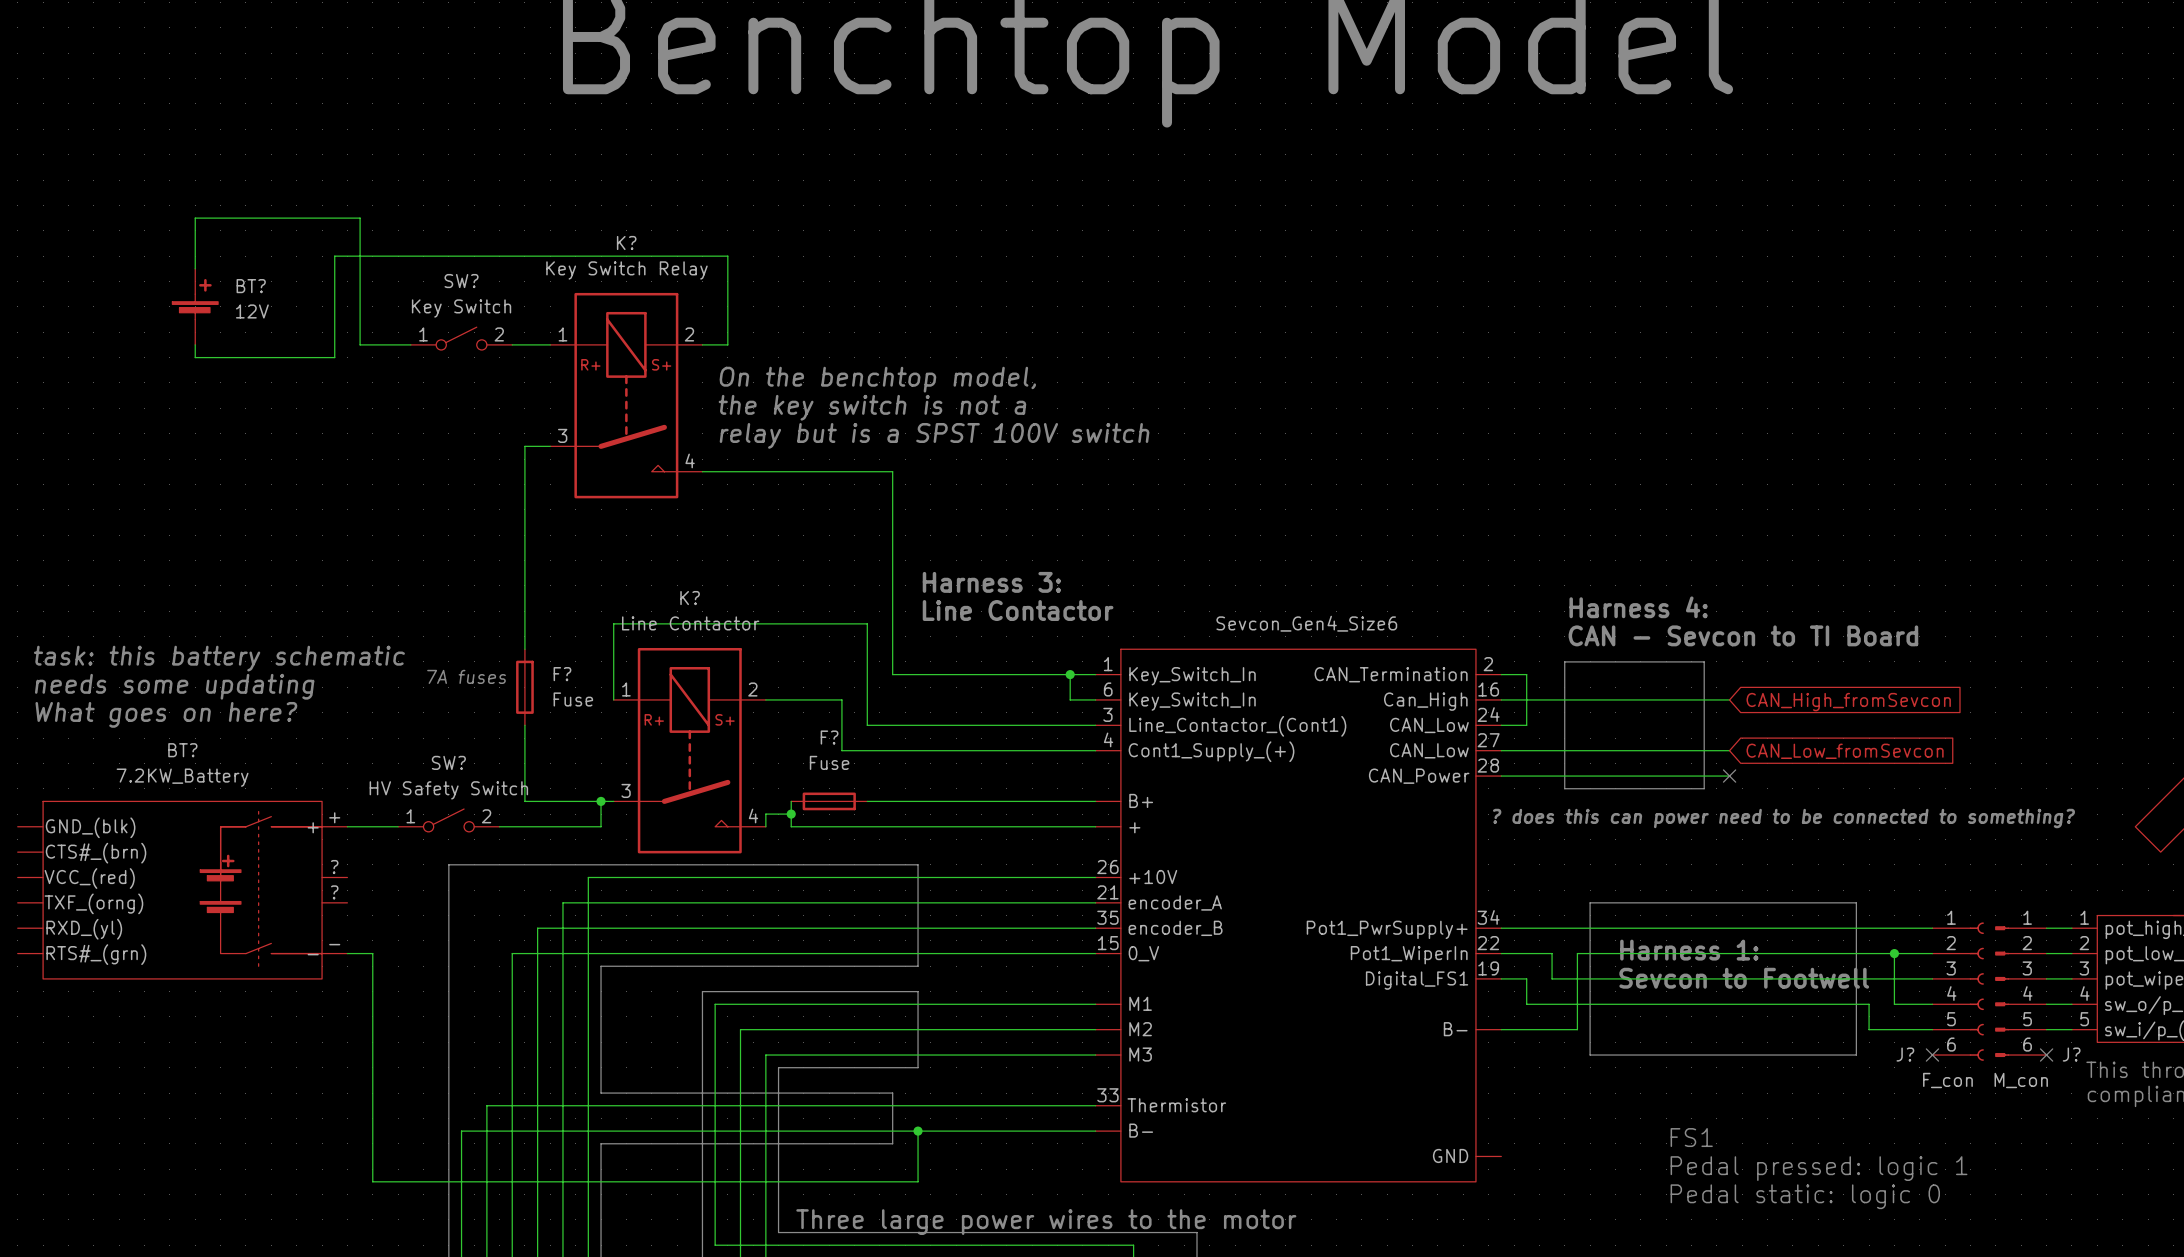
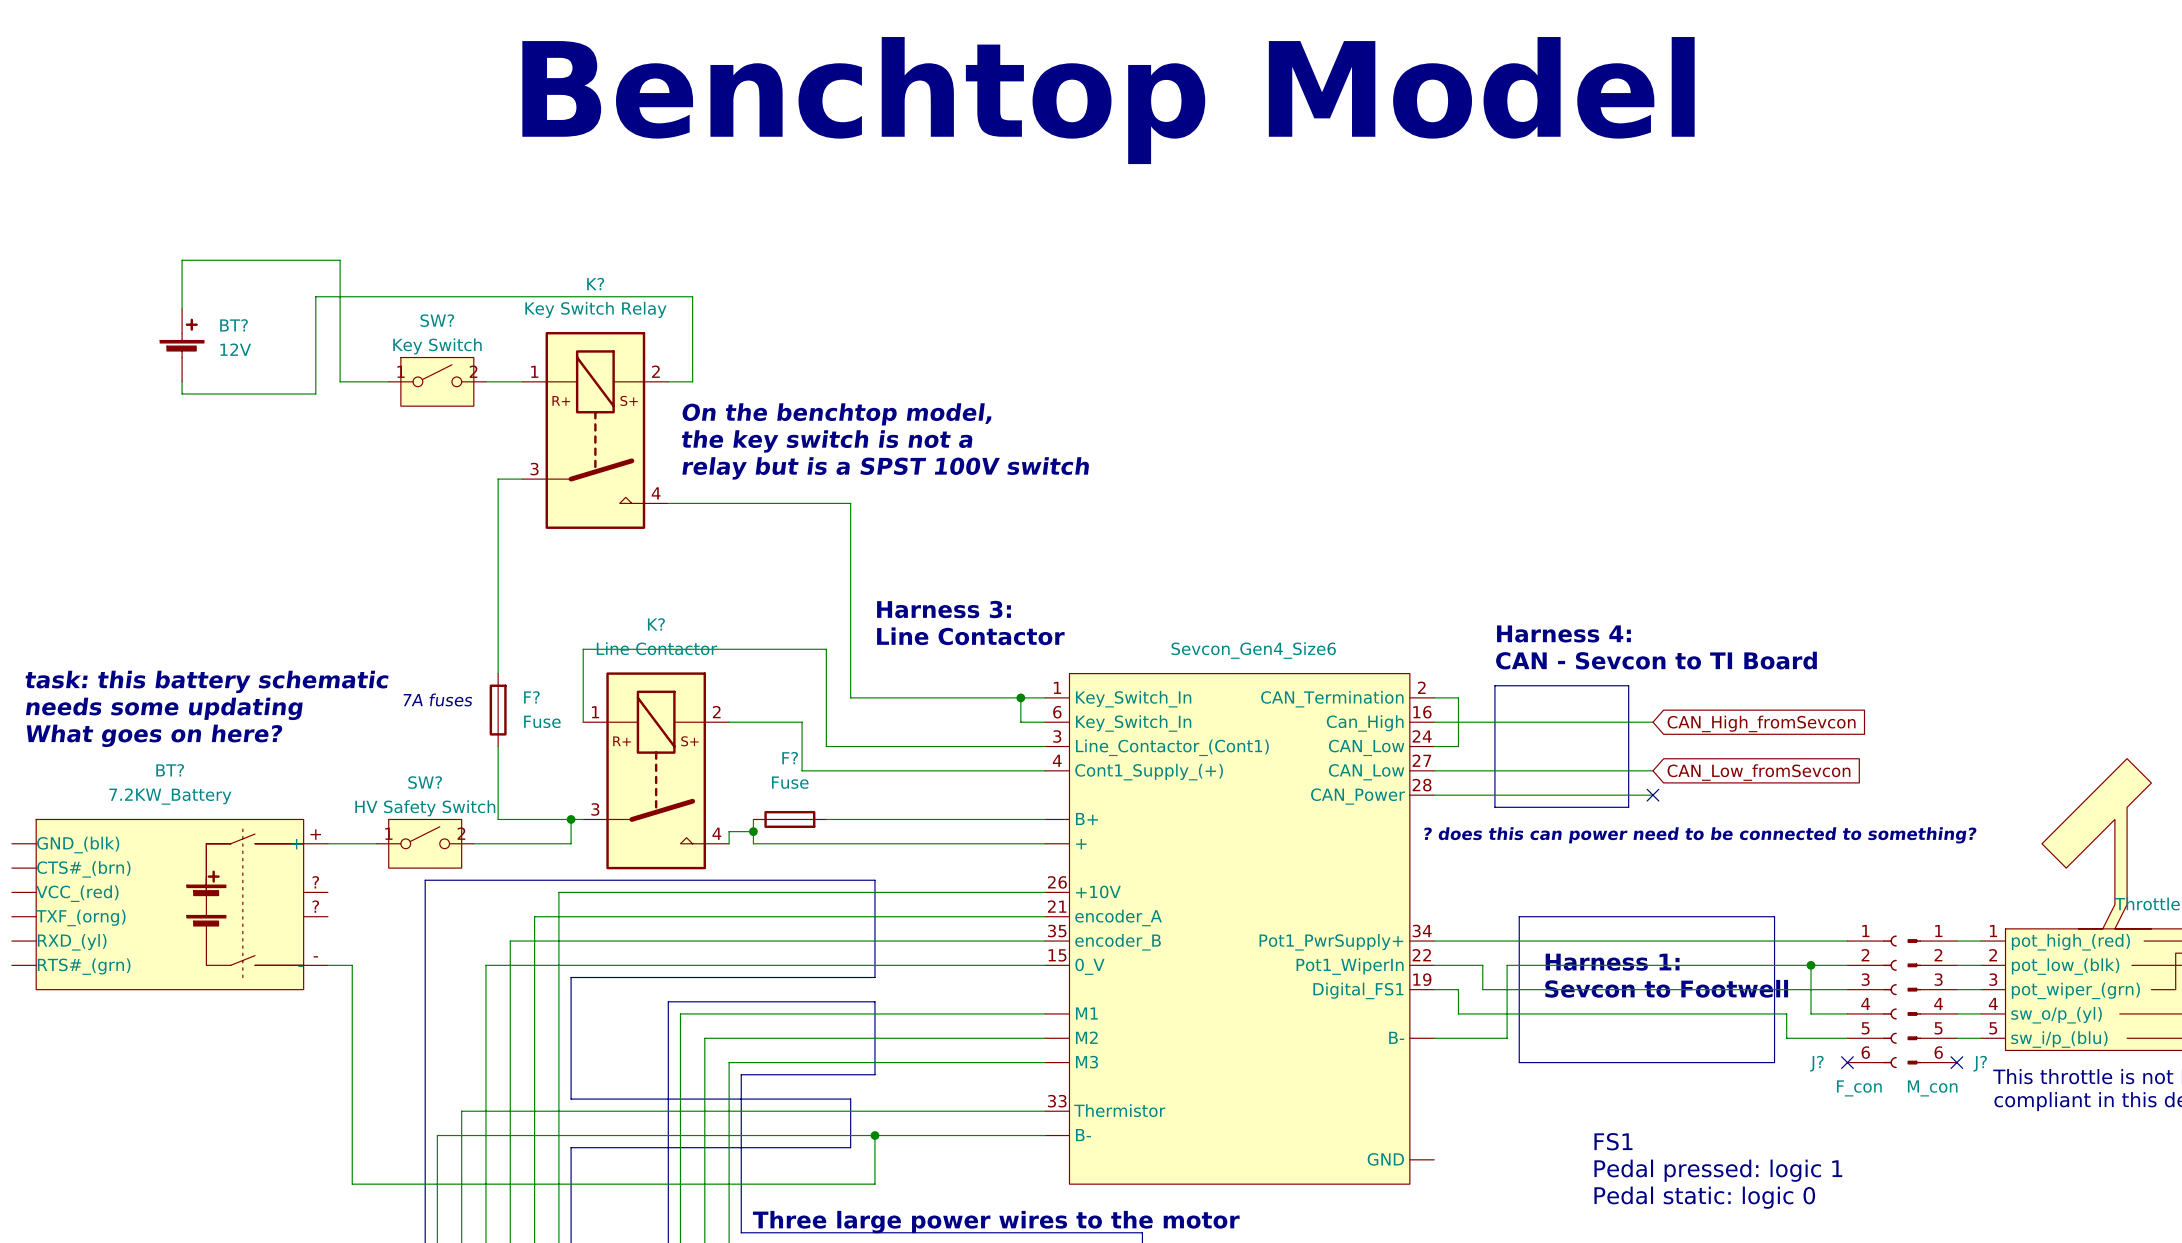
SW? symbol: [410, 327, 513, 350] -> [388, 357, 486, 407]
SW? symbol: [398, 809, 500, 832] -> [376, 819, 474, 869]

